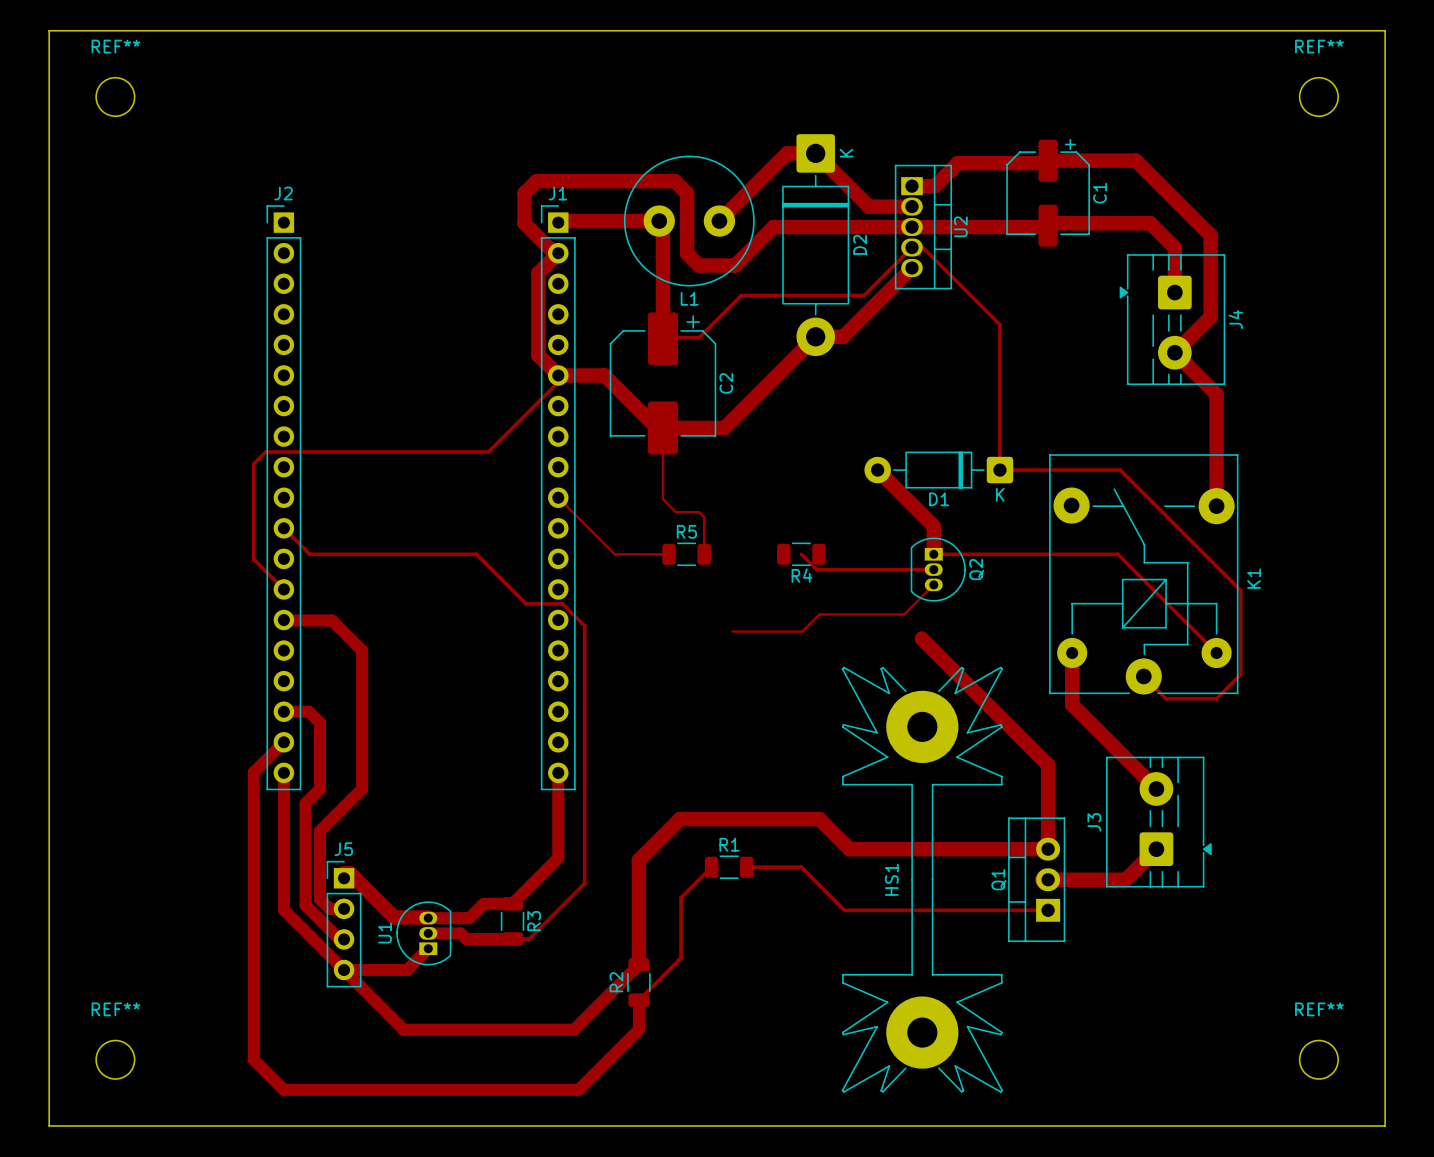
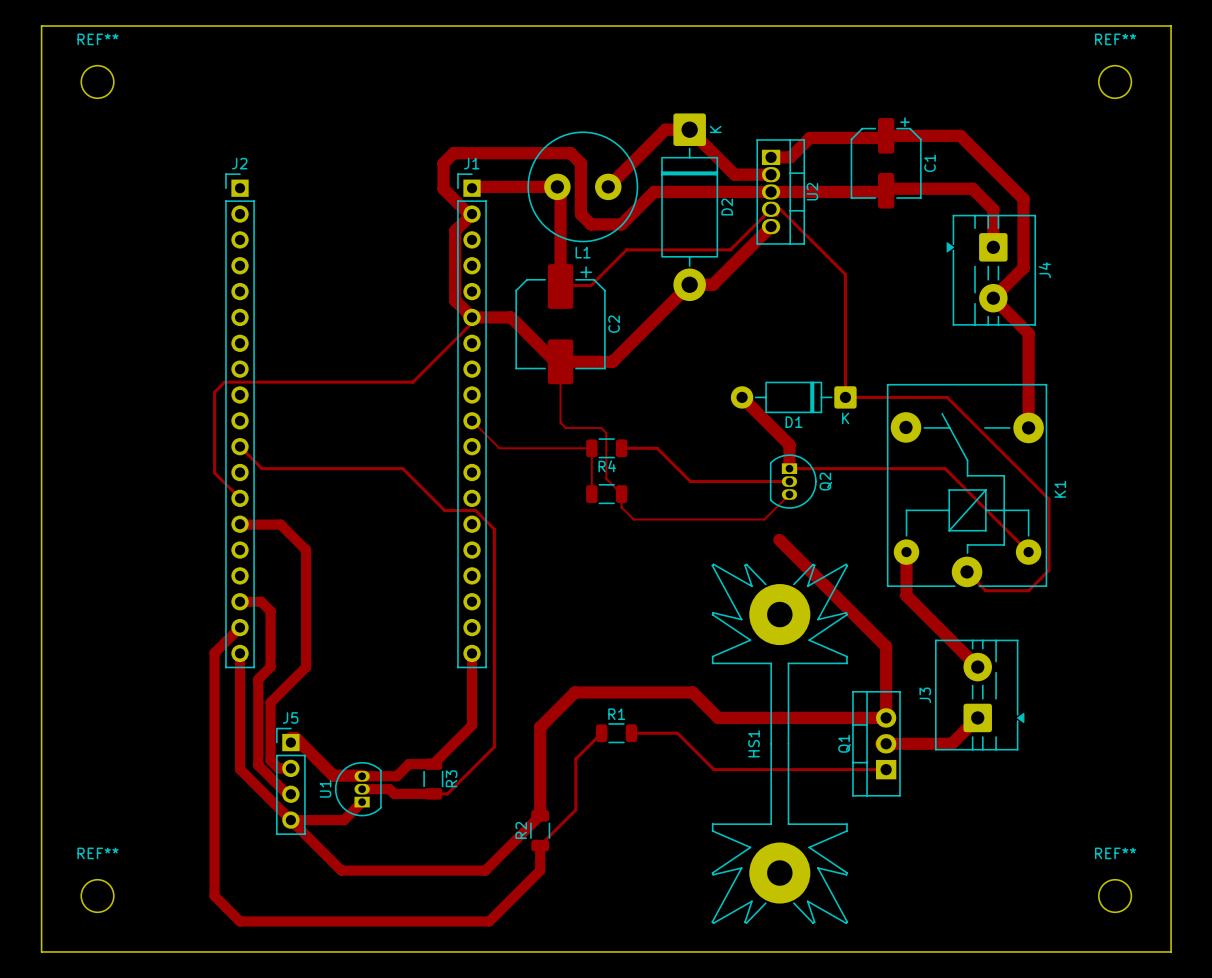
track: (662, 499) (675, 512) (699, 512) (704, 517) (704, 554) -> (560, 422) (565, 427) (601, 427) (606, 433) (606, 478) (621, 494) (621, 507) (633, 519) (692, 519)
track: (590, 530) (614, 554) (669, 554) -> (499, 448) (591, 448) (591, 494)
track: none -> (621, 448) (657, 448) (677, 468)
R5: (686, 554) -> none
R4 position: (801, 554) -> (606, 448)
part: none -> (606, 494)
track: (819, 614) (802, 631) (732, 631) -> none

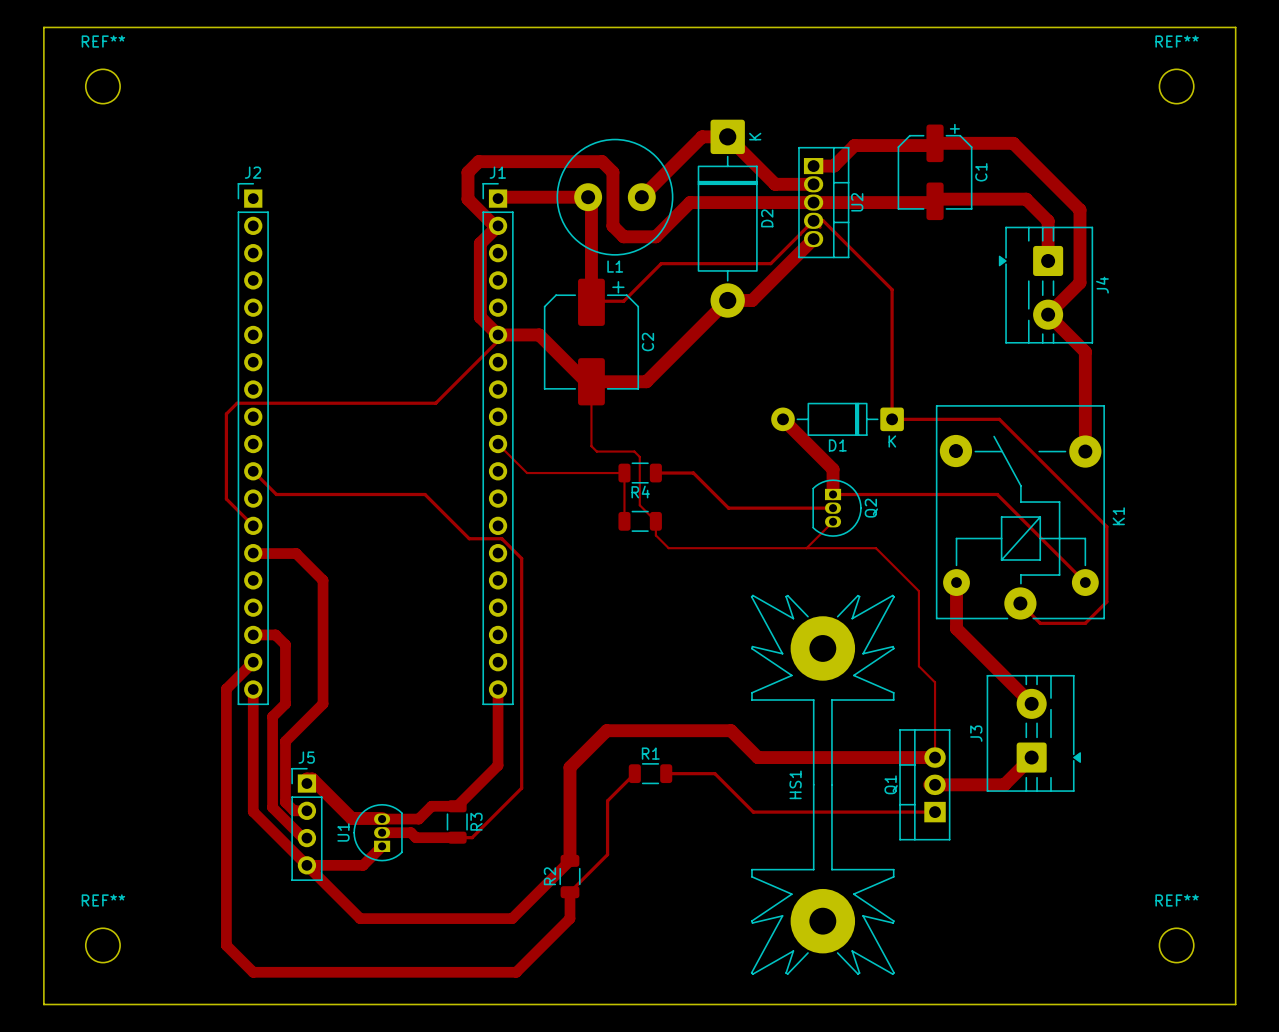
track: (779, 539) (870, 631) -> (806, 548) (875, 548) (918, 591) (918, 666)
track width: thick (870, 631) (886, 646) (886, 717) -> thin (918, 666) (935, 682) (935, 757)

